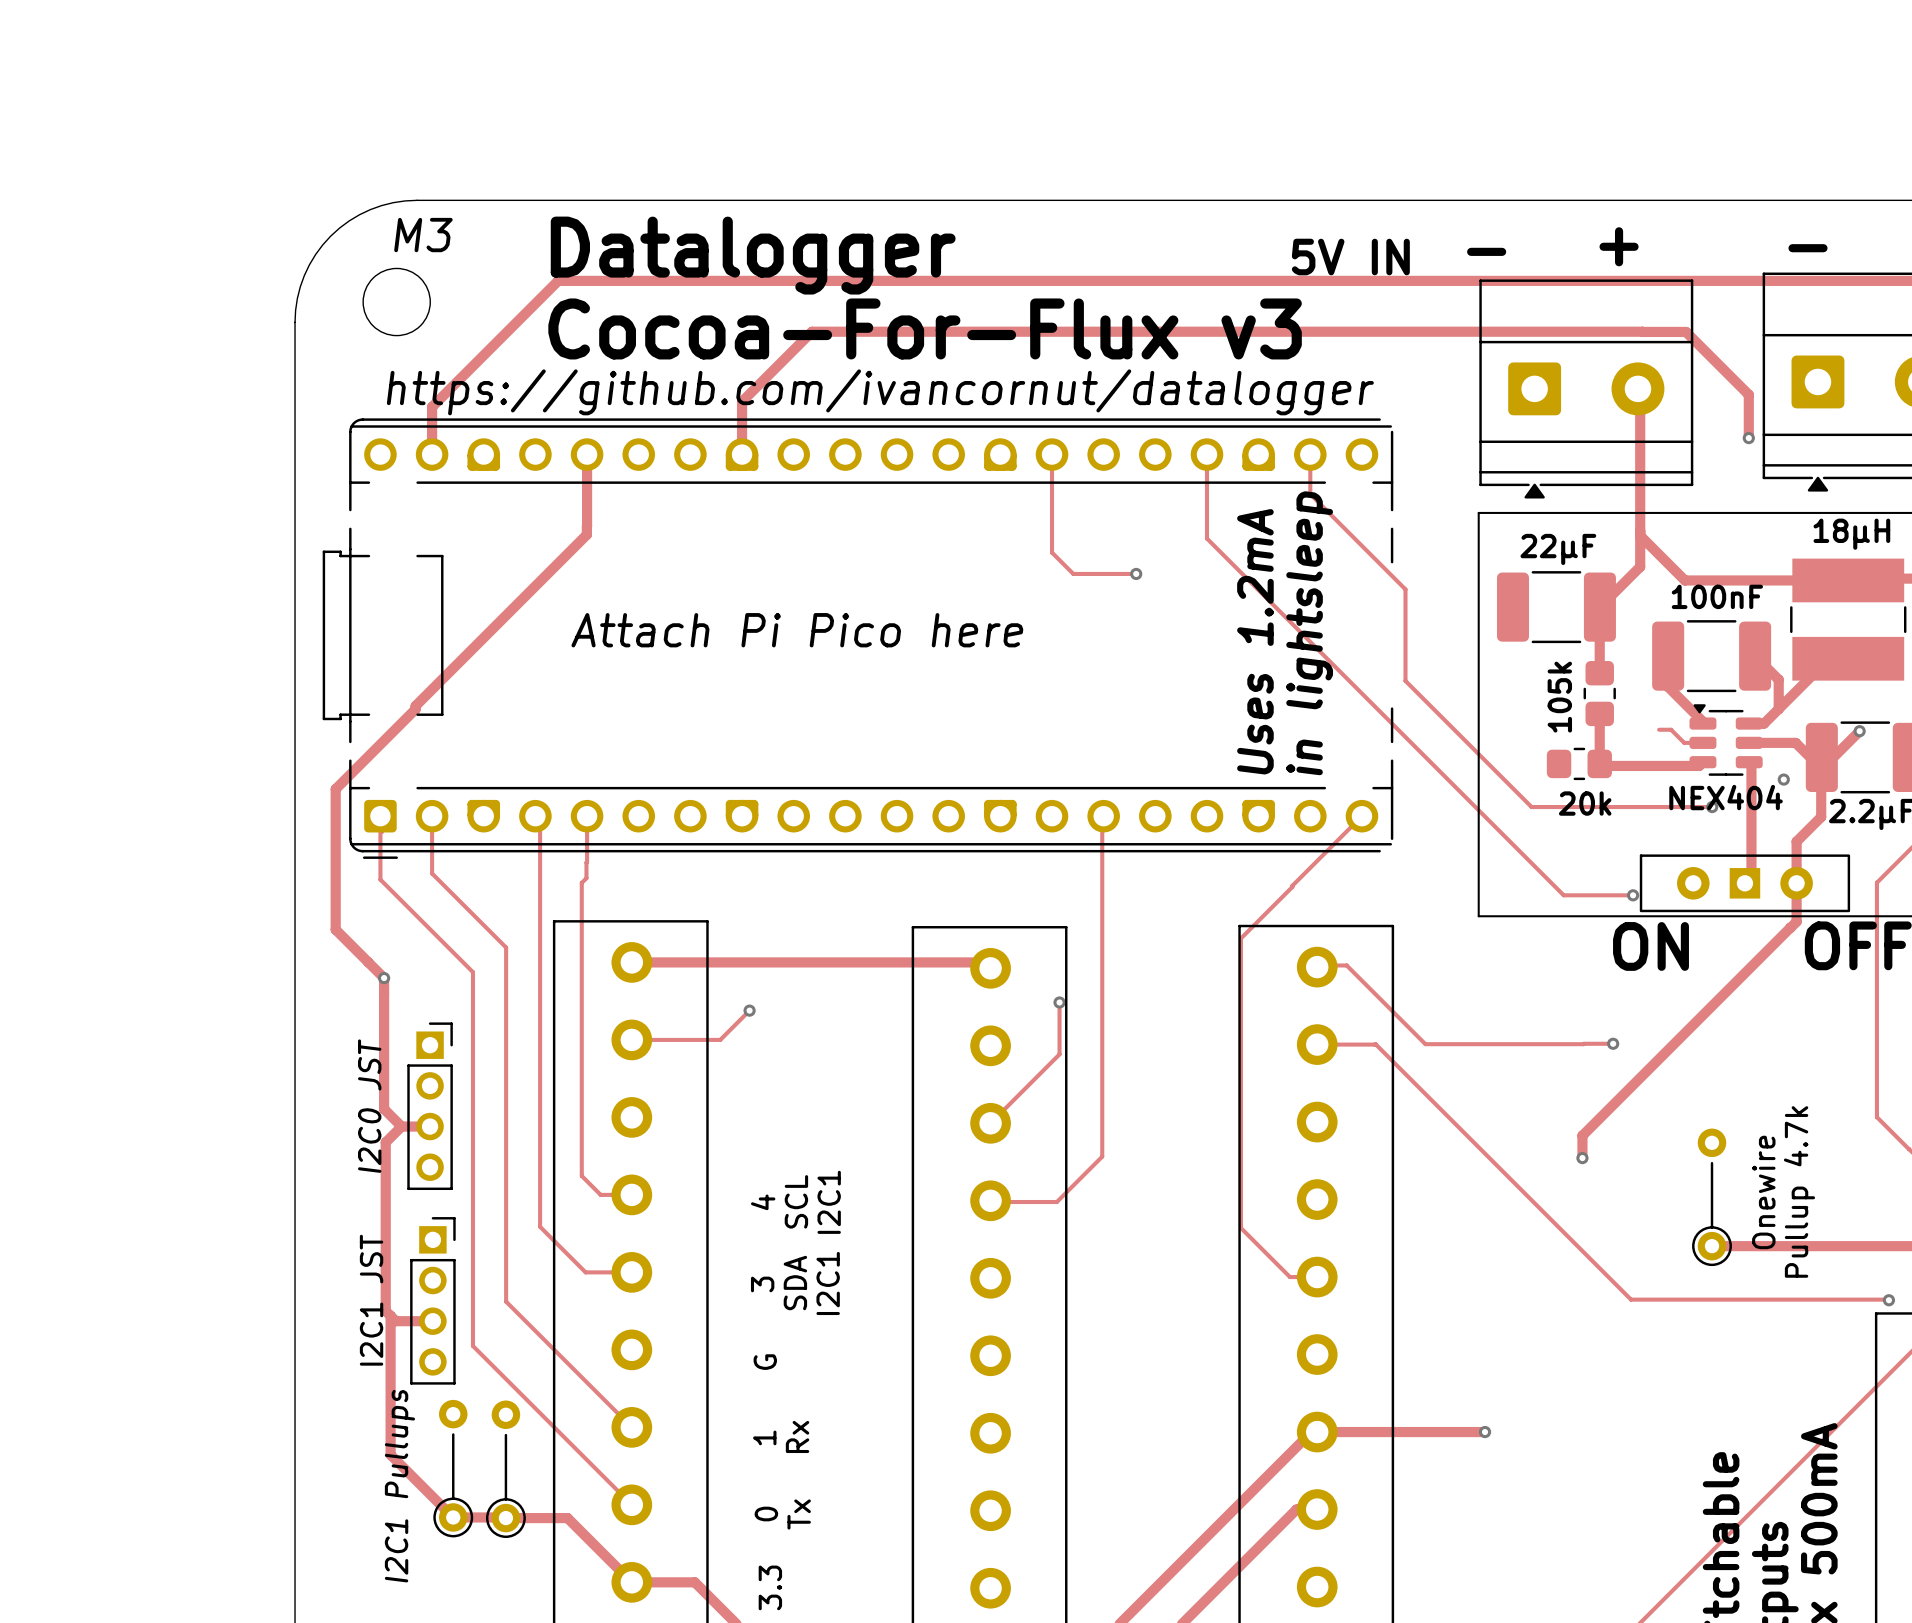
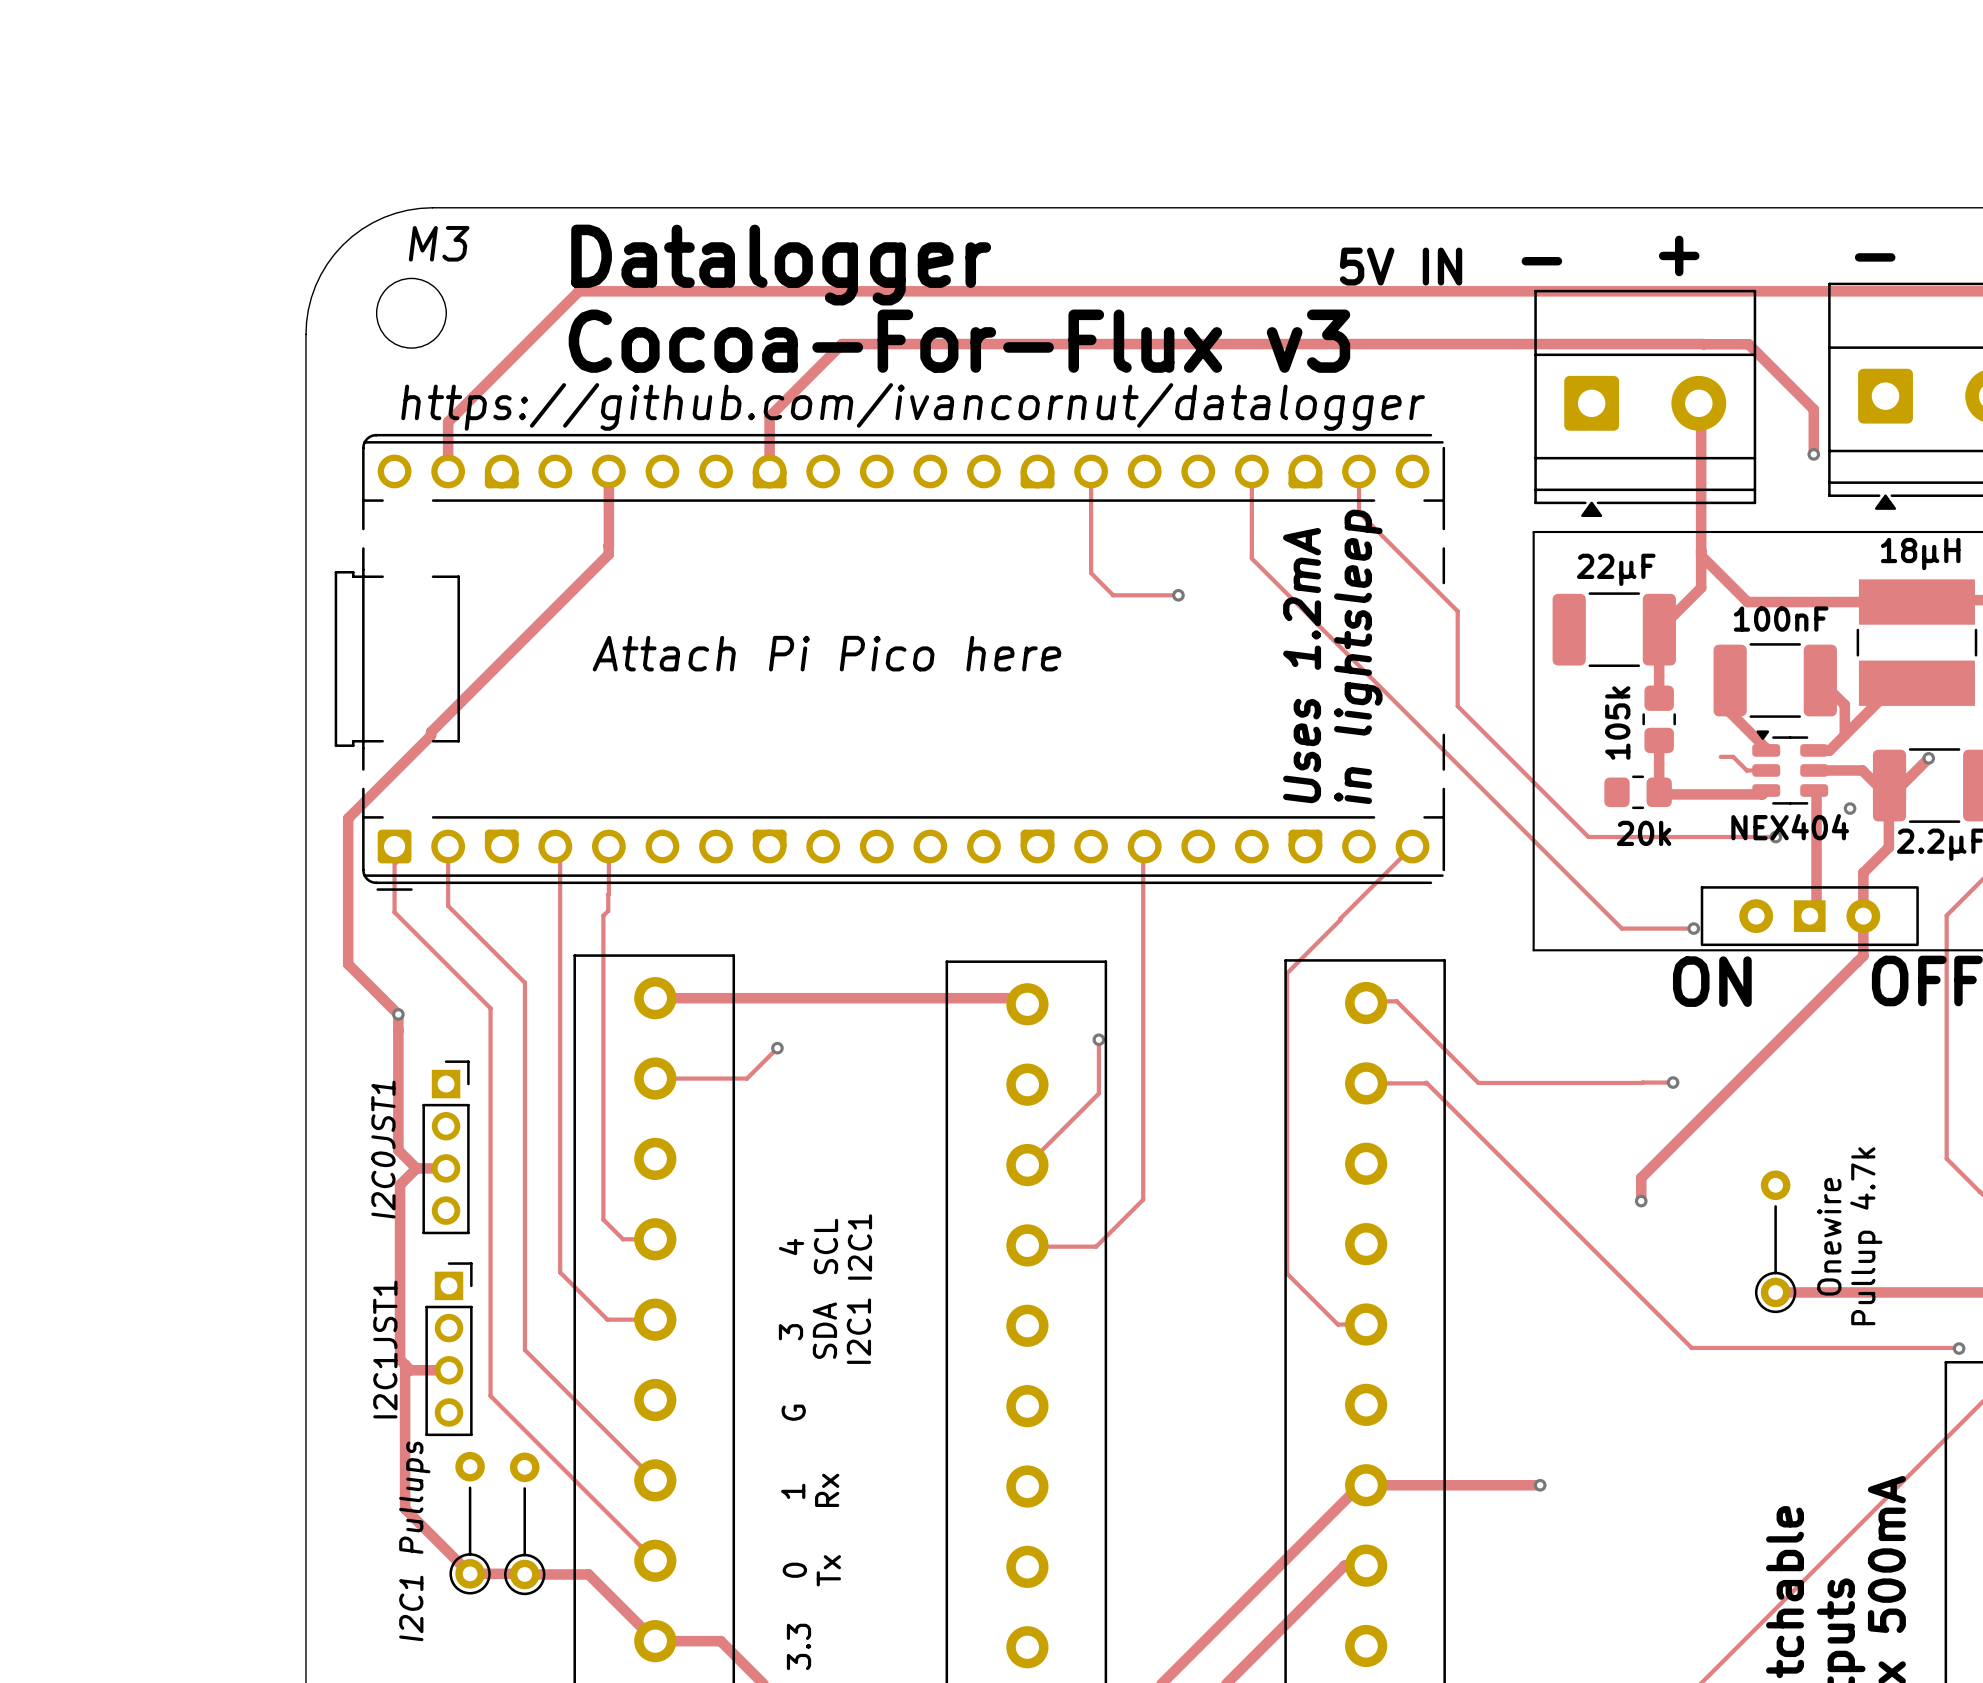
I2C0 JST name: I2C0 JST (369, 1106) -> I2C0JST1 (383, 1149)
I2C1 JST name: I2C1 JST (371, 1300) -> I2C1JST1 (385, 1349)

